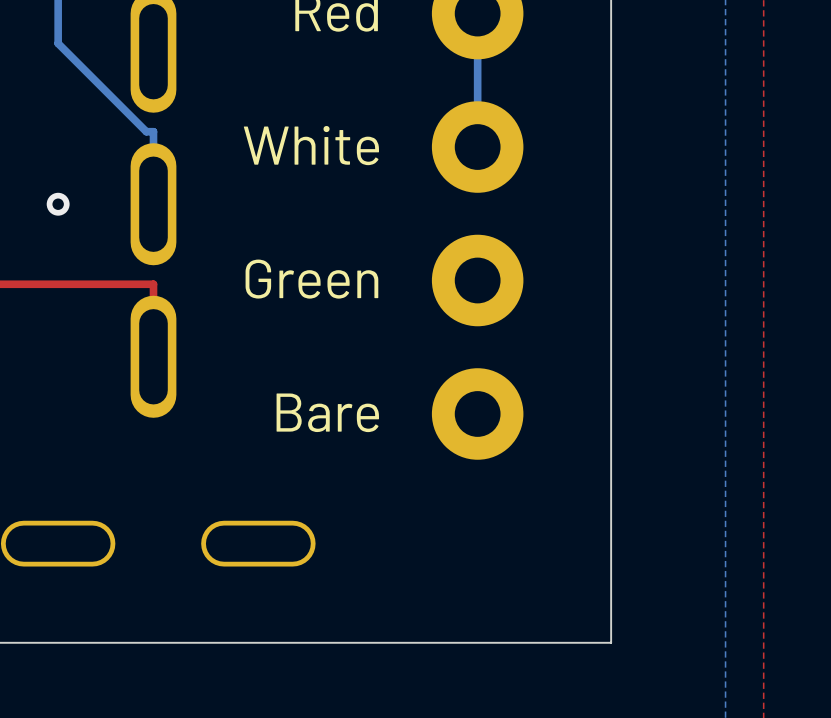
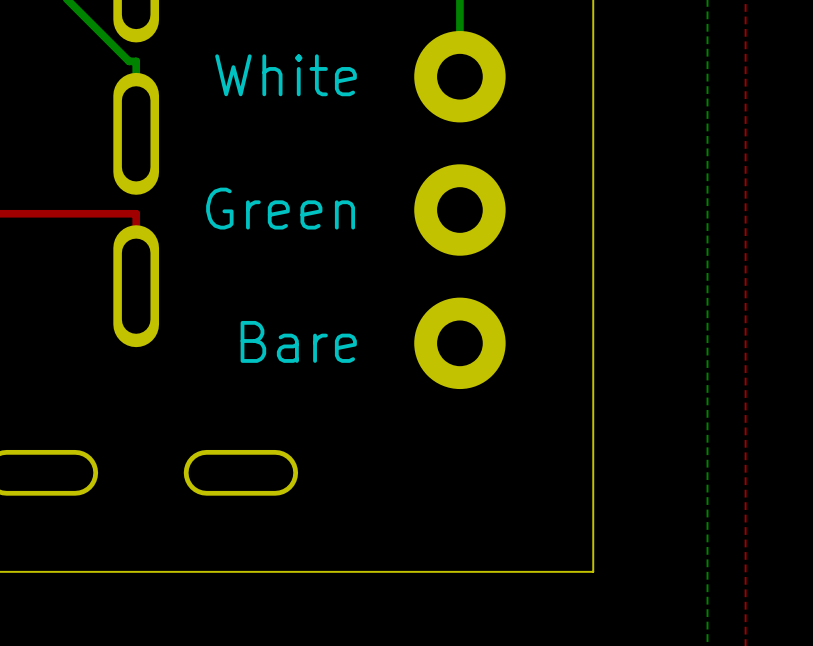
via: (58, 204) -> none

